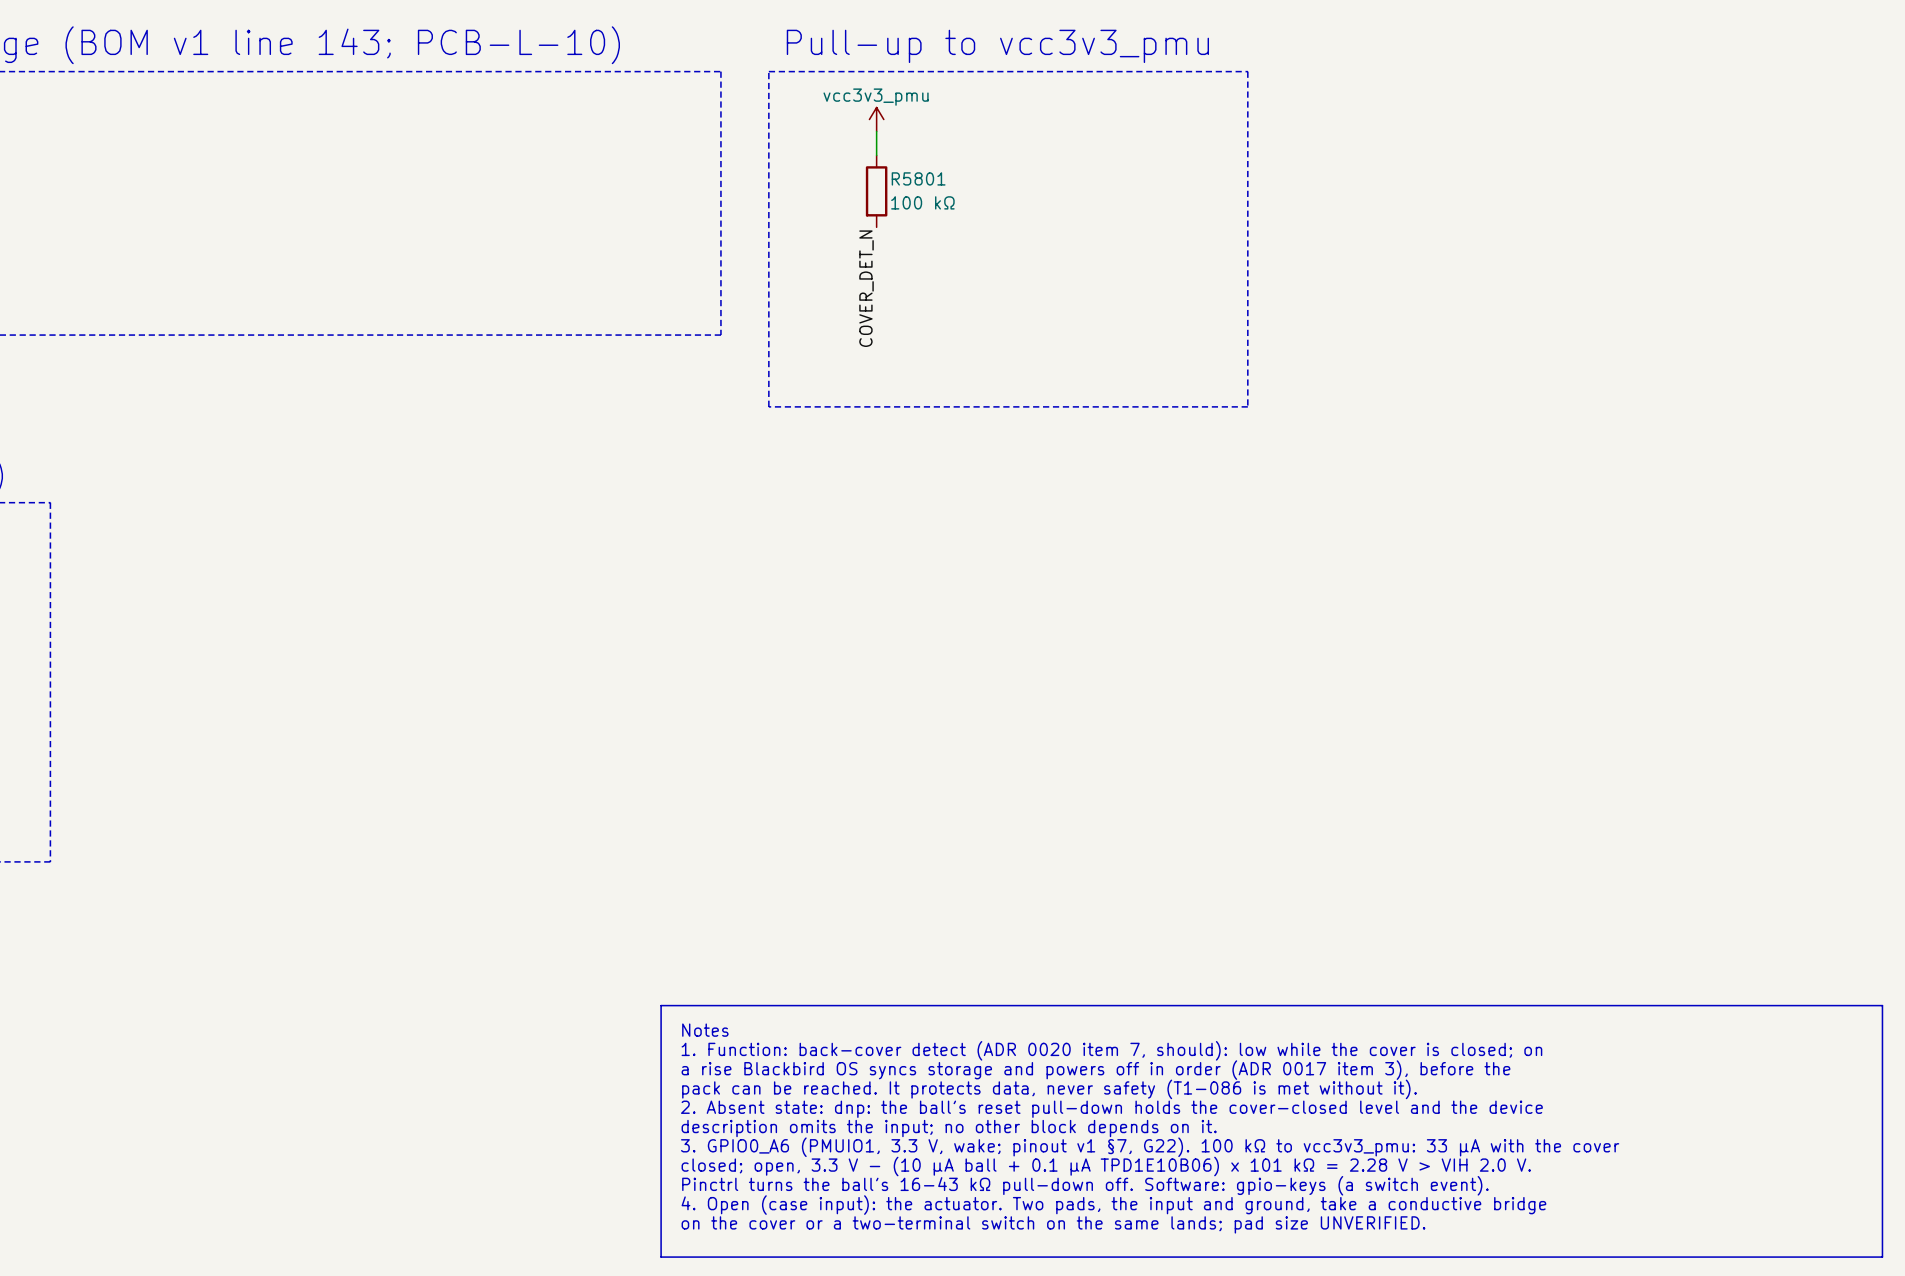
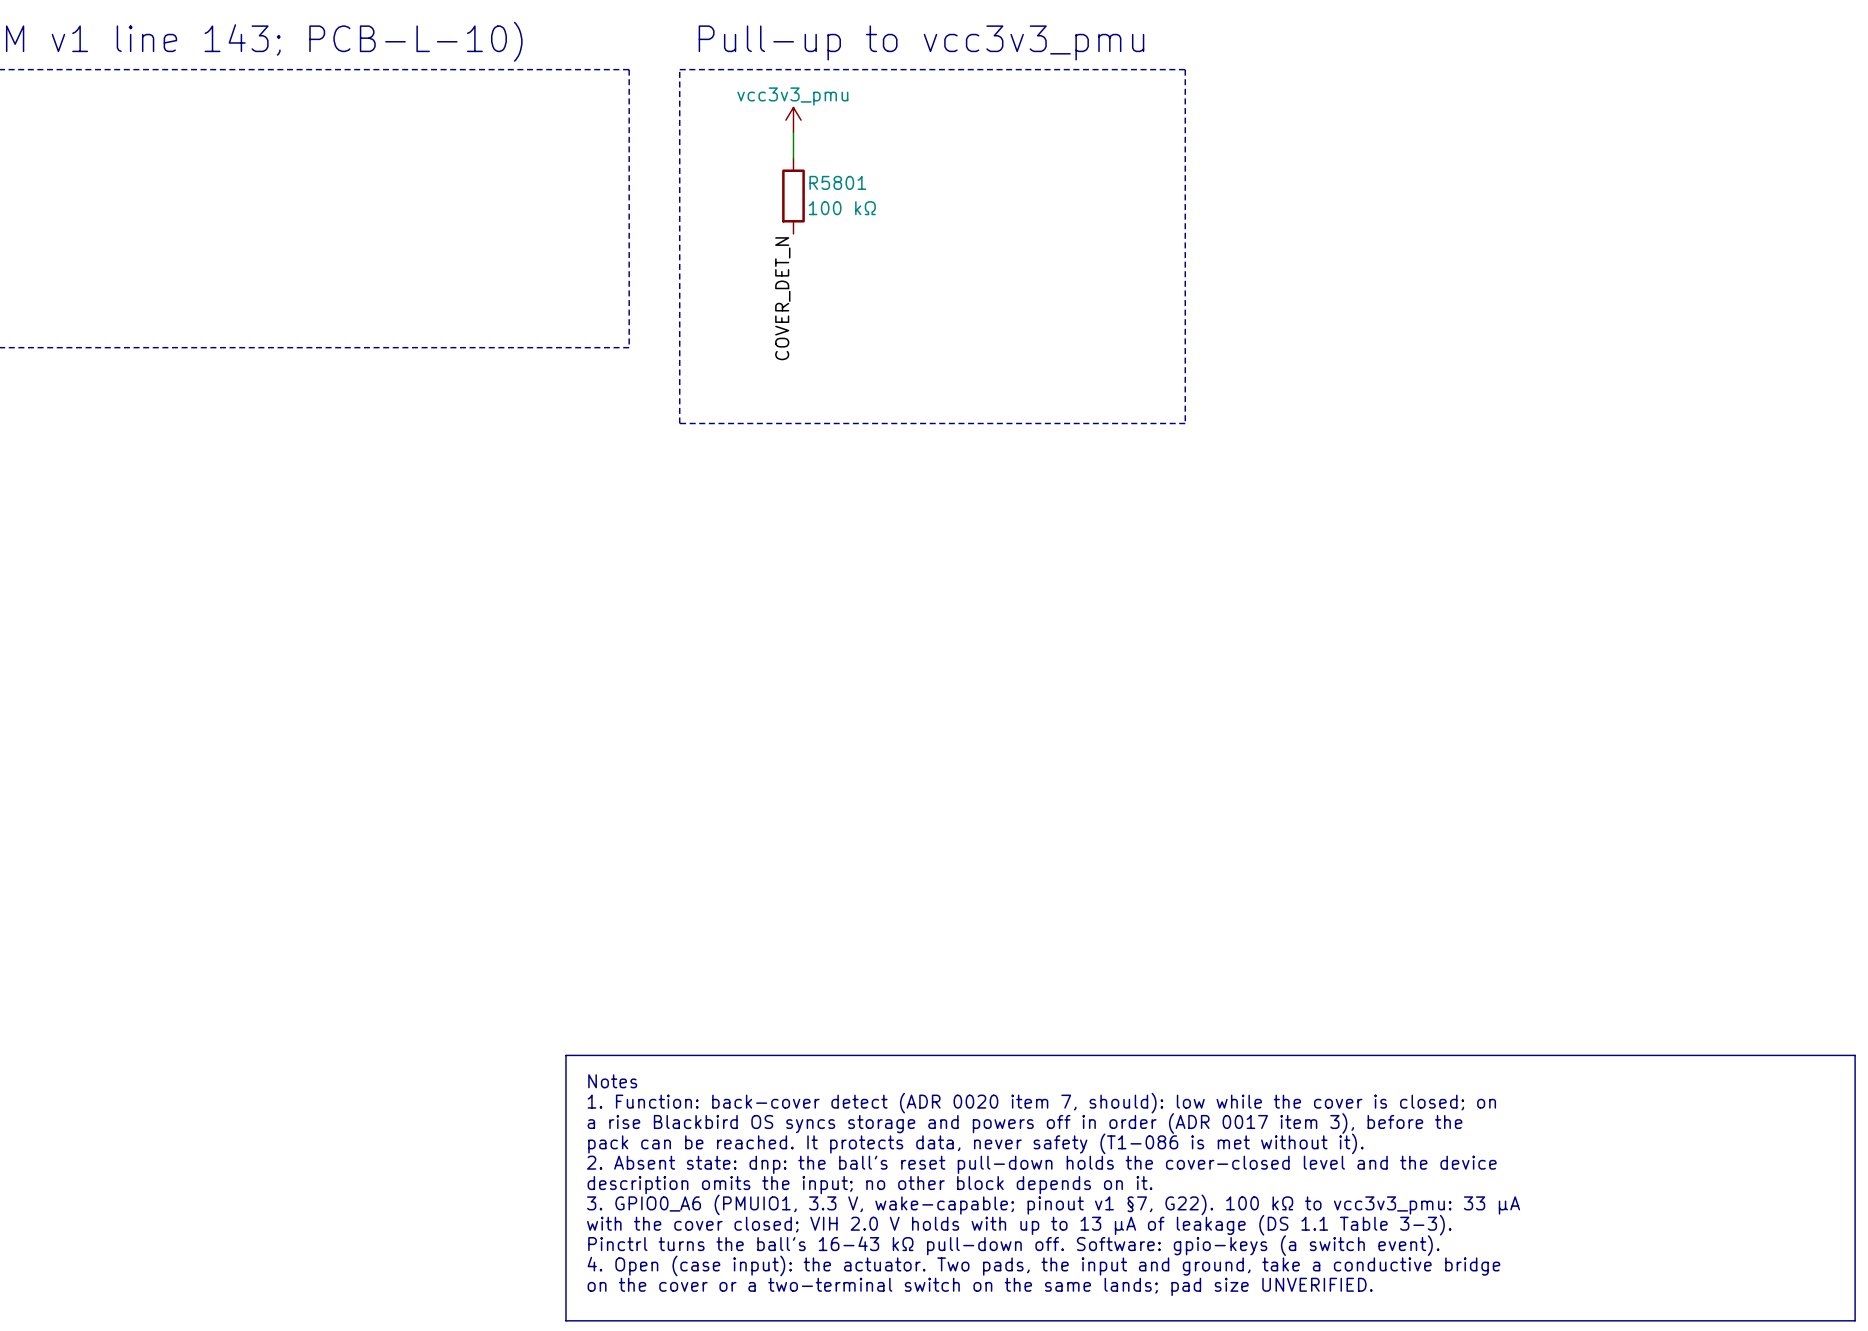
text: 3. GPIO0_A6 (PMUIO1, 3.3 V, wake; pinout v1 §7, G22). 100 kΩ to vcc3v3_pmu: 33 µA with the cover (1150, 1147) -> 3. GPIO0_A6 (PMUIO1, 3.3 V, wake-capable; pinout v1 §7, G22). 100 kΩ to vcc3v3_pmu: 33 µA (1053, 1204)
text: closed; open, 3.3 V - (10 µA ball + 0.1 µA TPD1E10B06) x 101 kΩ = 2.28 V > VIH 2.0 V. (1106, 1166) -> with the cover closed; VIH 2.0 V holds with up to 13 µA of leakage (DS 1.1 Table 3-3). (1019, 1225)

